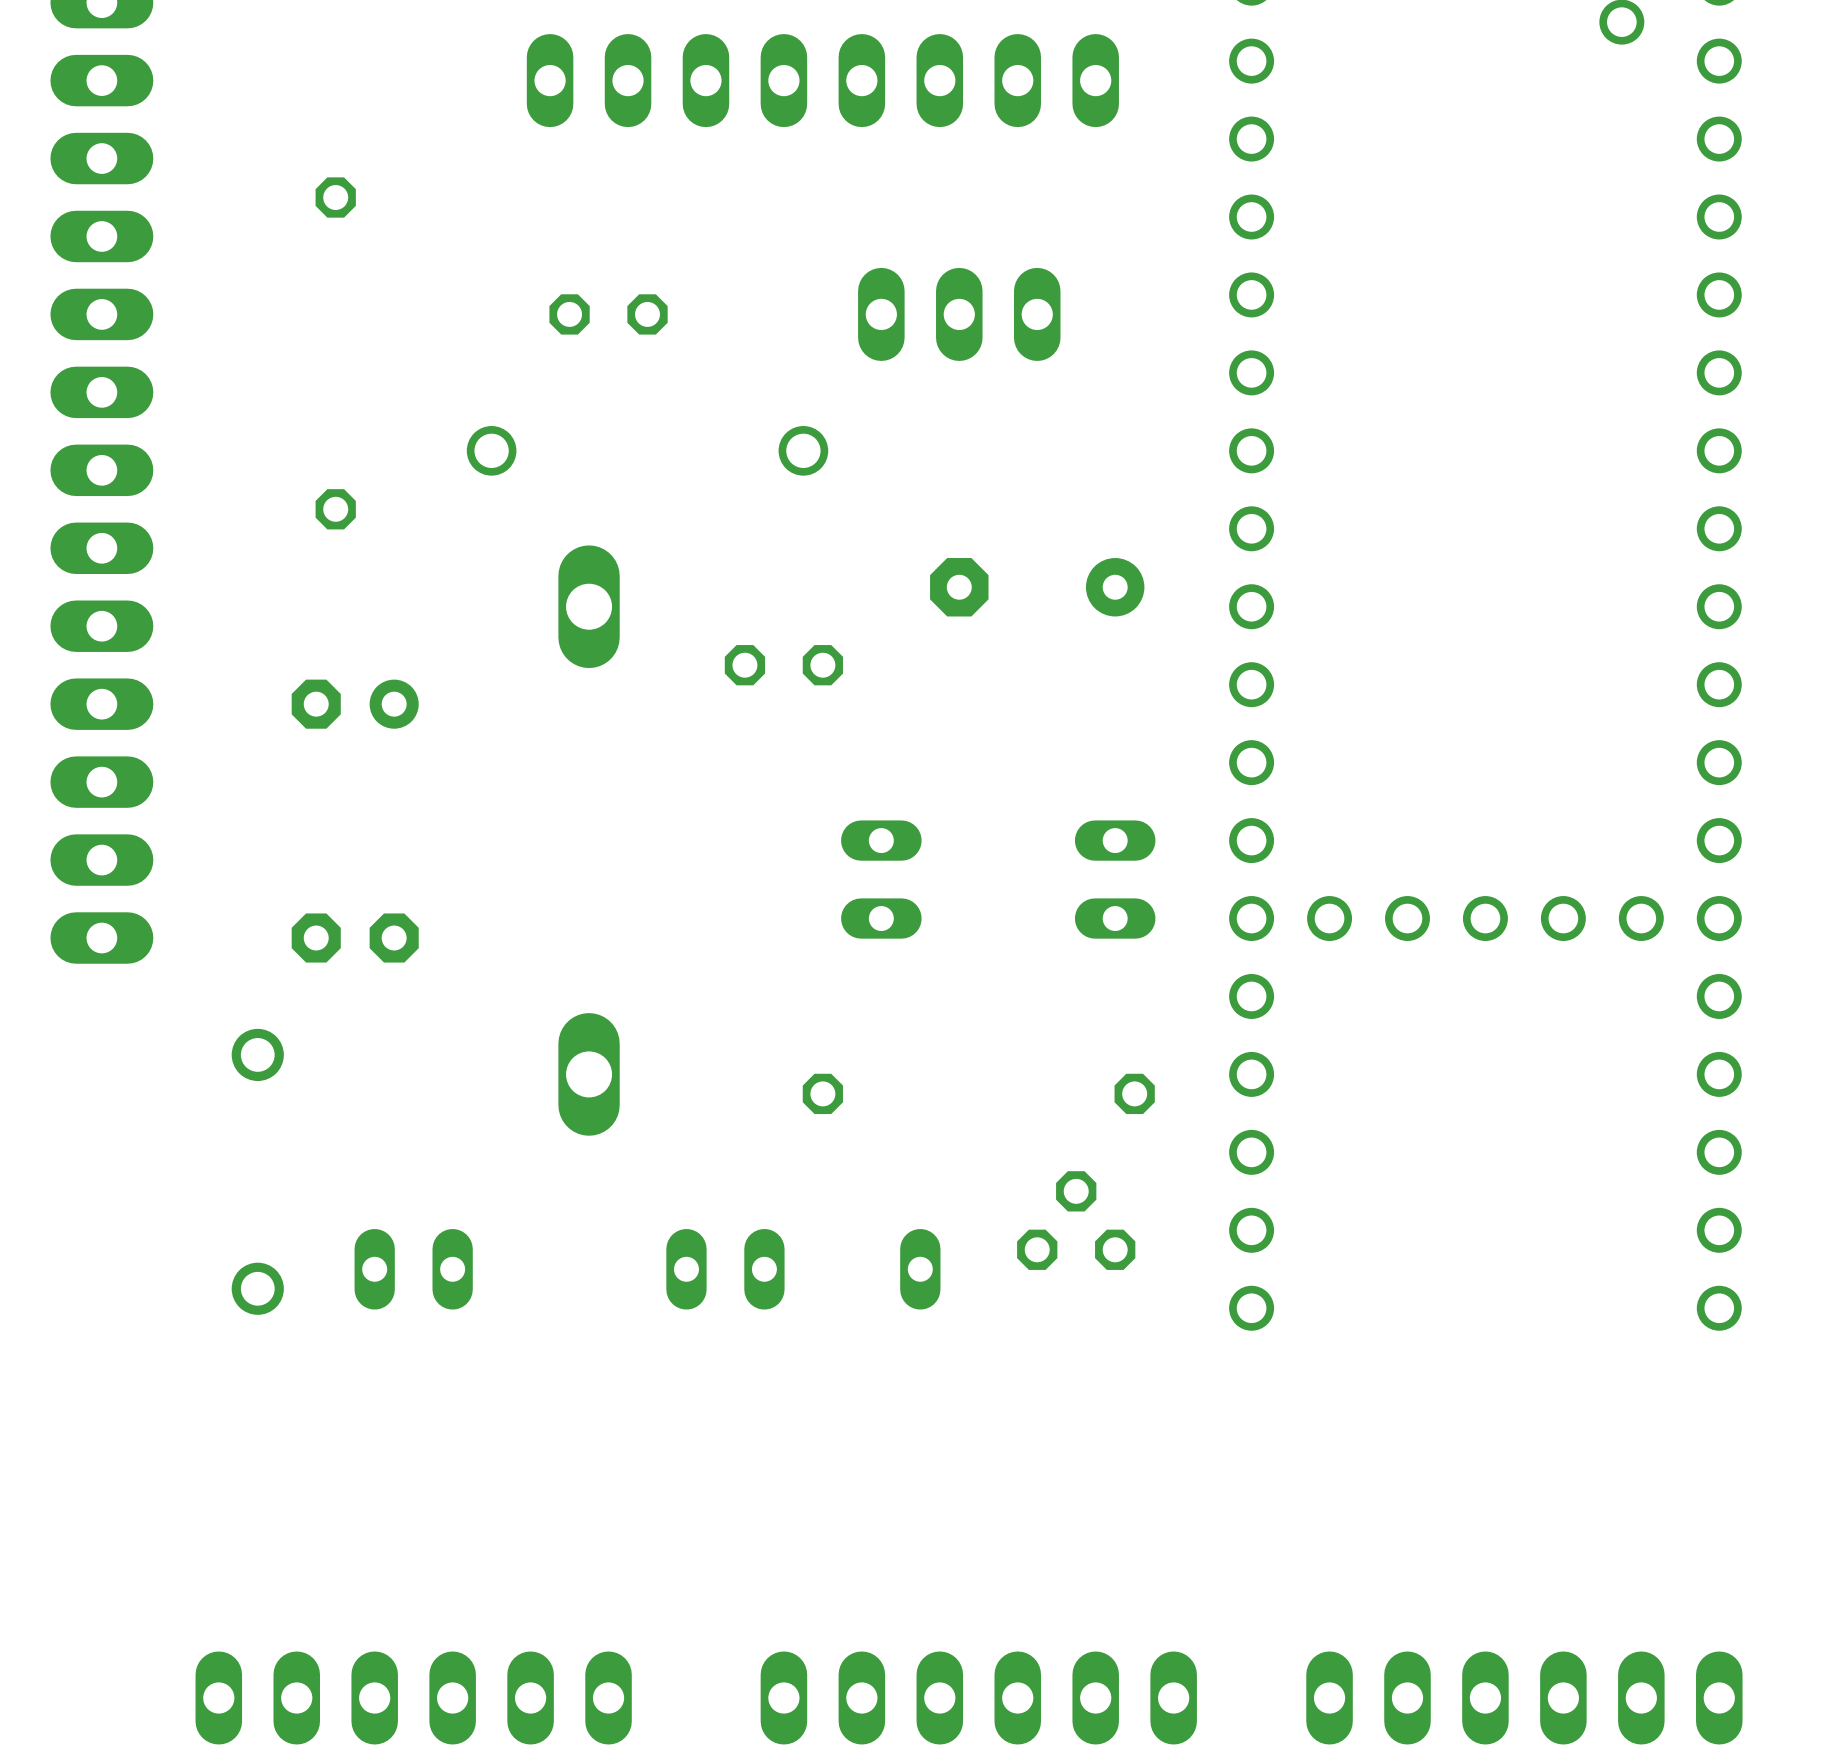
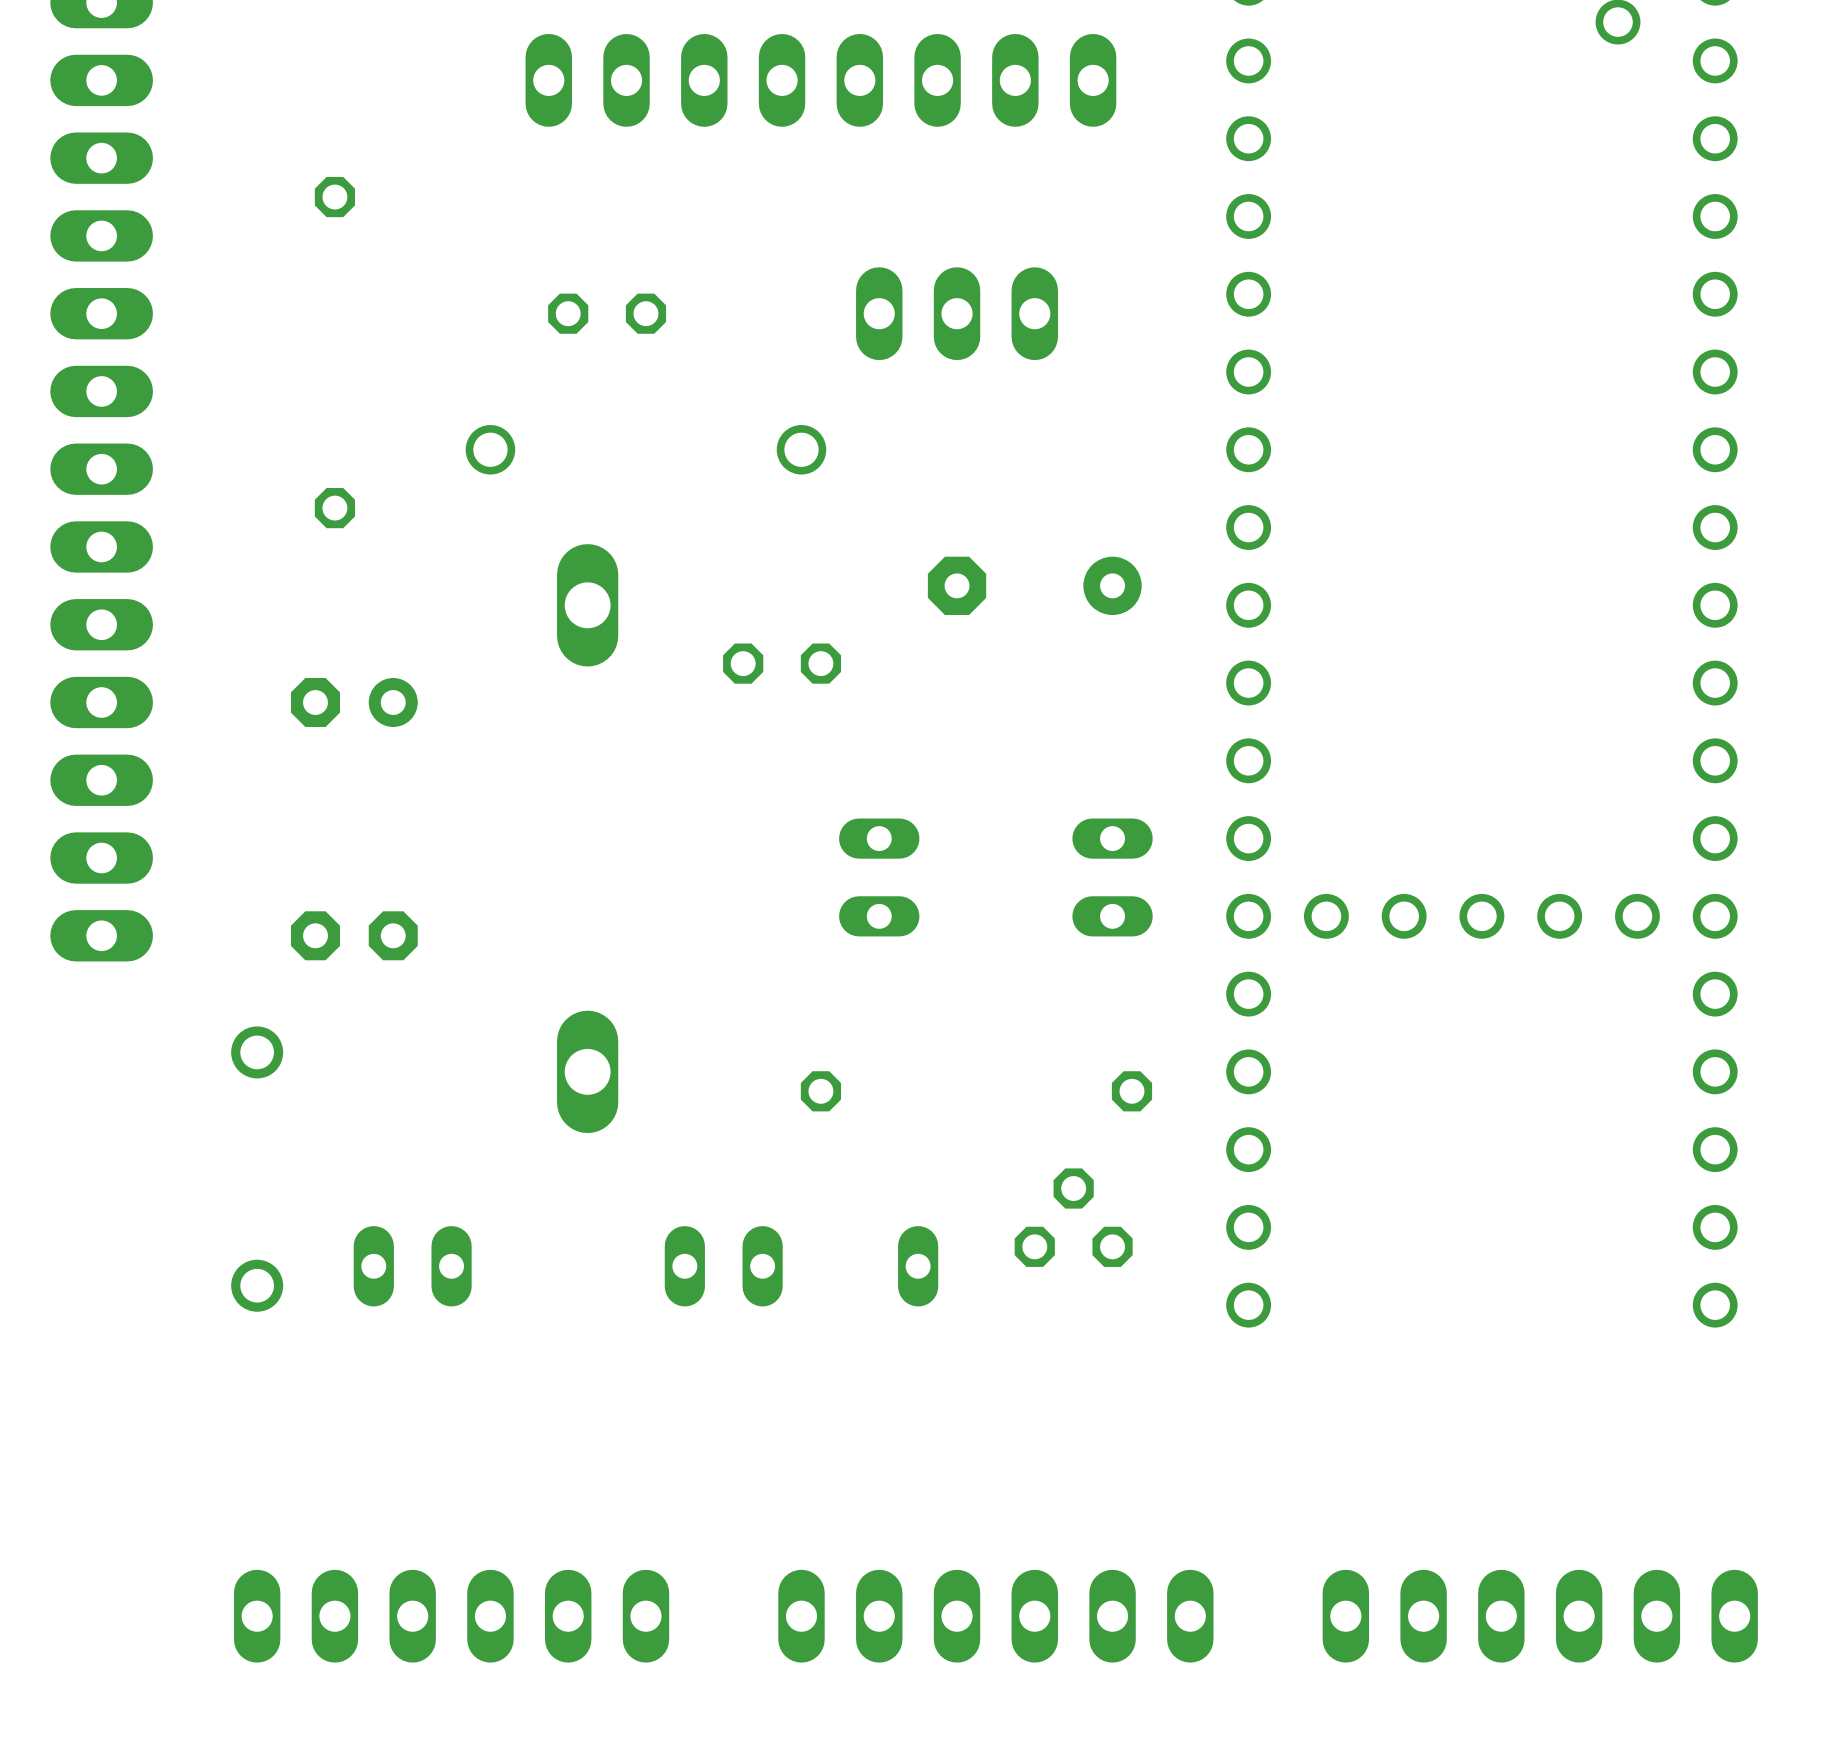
part position: (413, 1697) -> (451, 1616)
part position: (978, 1697) -> (995, 1616)
part position: (1524, 1697) -> (1540, 1616)

